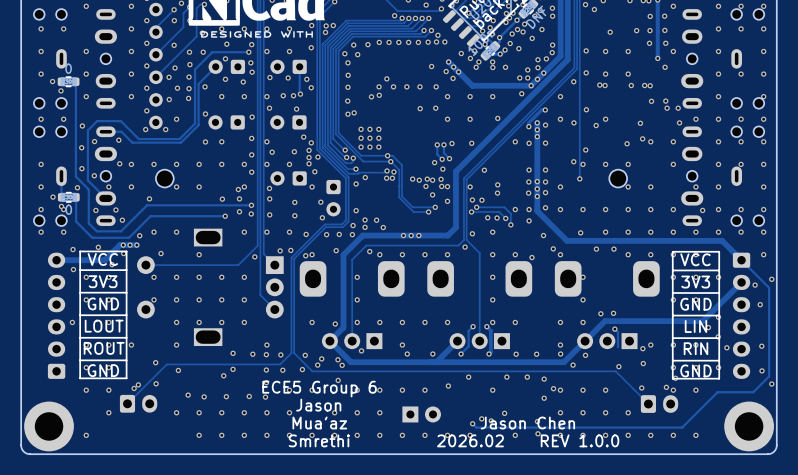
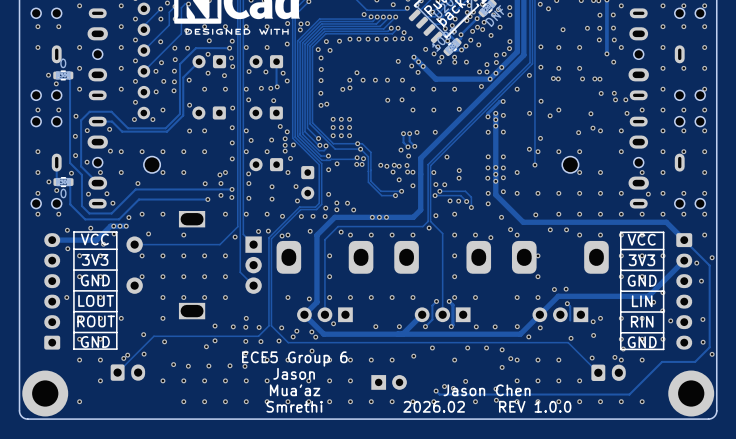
via: (41, 74) -> none
via: (560, 119) -> none
via: (515, 141) -> none
via: (244, 164) -> none
via: (63, 209) -> none
via: (515, 209) -> none
via: (402, 345) -> none
via: (560, 345) -> none

